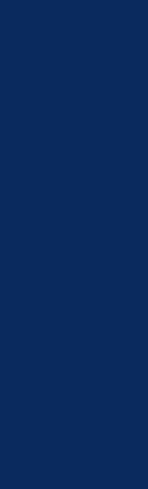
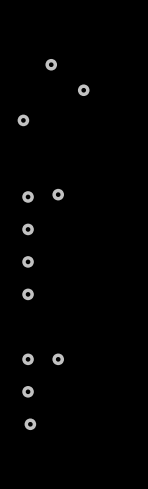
via: none -> (51, 64)
via: none -> (83, 90)
via: none -> (23, 120)
via: none -> (58, 194)
via: none -> (28, 196)
via: none -> (28, 229)
via: none -> (28, 261)
via: none -> (28, 294)
via: none -> (28, 359)
via: none -> (58, 359)
via: none -> (28, 391)
via: none -> (30, 424)

